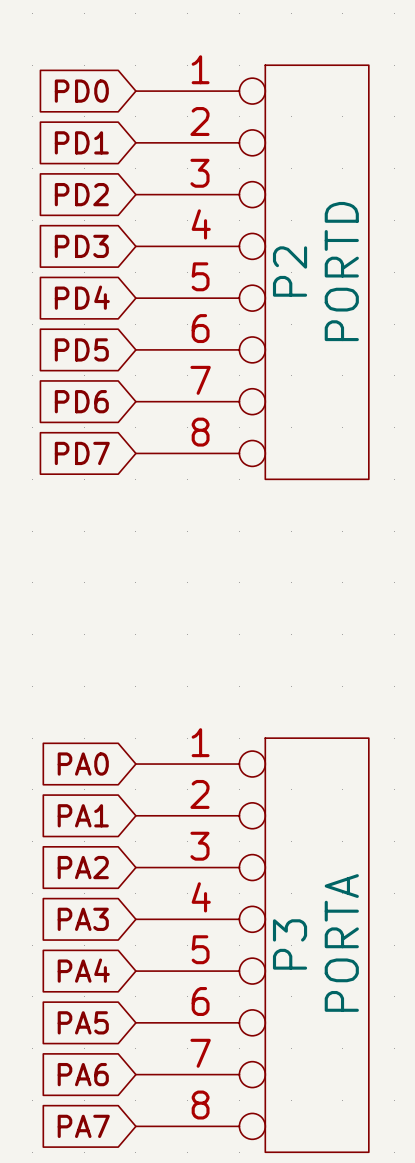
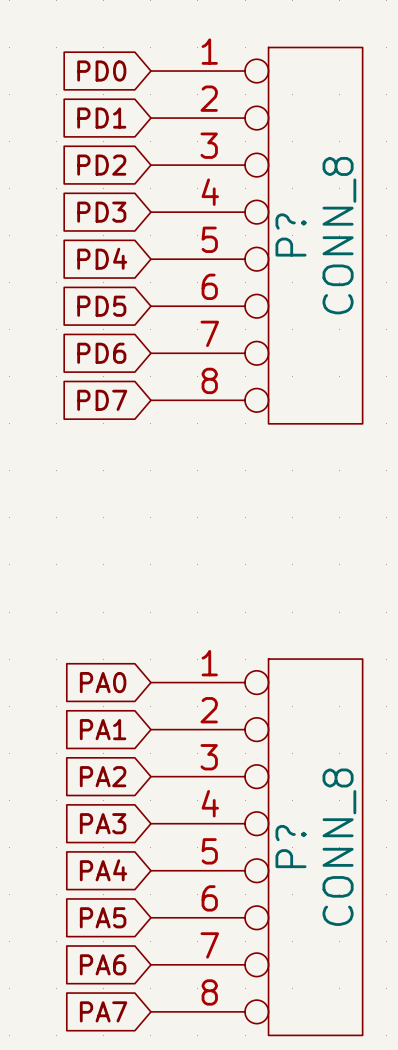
P2 name: P2 (290, 271) -> P? (291, 234)
P2 value: PORTD (341, 271) -> CONN_8 (339, 235)
P3 value: PORTA (341, 942) -> CONN_8 (339, 847)
P3 name: P3 (290, 944) -> P? (291, 846)

